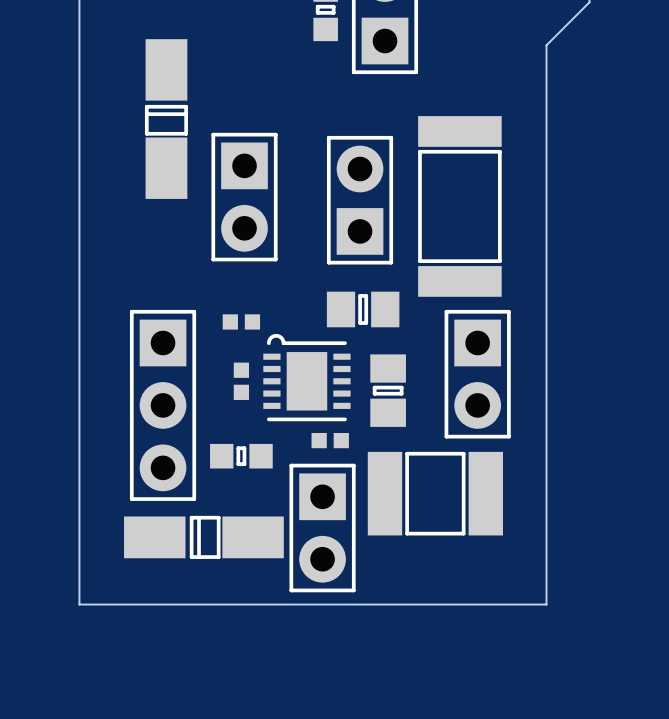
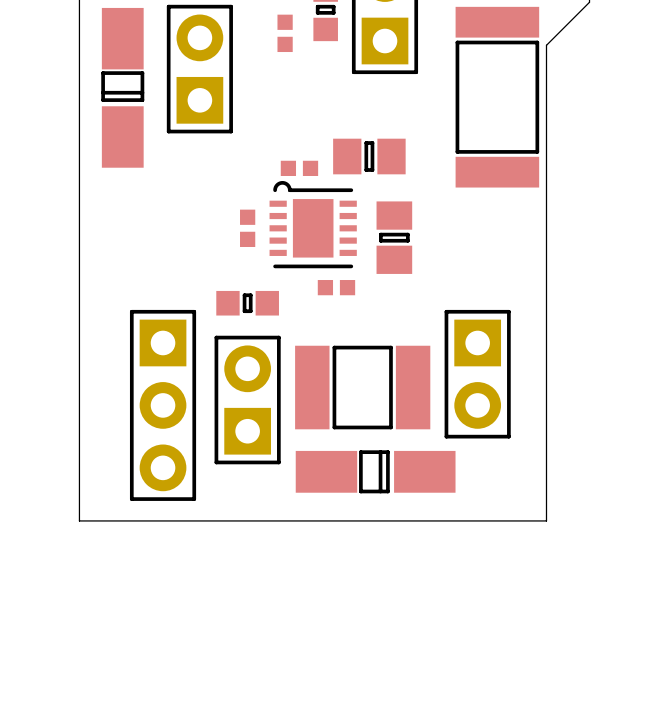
part: none -> (285, 33)
part: none -> (199, 69)
part rotation: 0° (166, 119) -> 180° (122, 87)
part: none -> (369, 156)
part: none -> (299, 168)
part: (244, 197) -> none
part: (360, 200) -> none
part position: (459, 206) -> (497, 97)
part: none -> (247, 228)
part: none -> (394, 237)
part: none -> (336, 287)
part: (363, 309) -> none
part footprint: [222, 314, 261, 330] -> [216, 290, 279, 316]
part footprint: [233, 362, 250, 400] -> [214, 335, 281, 465]
part position: (306, 377) -> (313, 224)
part: (388, 390) -> none
part: (330, 440) -> none
part: (241, 456) -> none
part position: (435, 493) -> (362, 387)
board edge: (79, 520) (79, 604) (546, 604) (546, 520) -> (79, 520) (546, 520)
part: (322, 528) -> none
part rotation: 0° (203, 537) -> 180° (375, 471)
part position: (203, 537) -> (375, 471)

